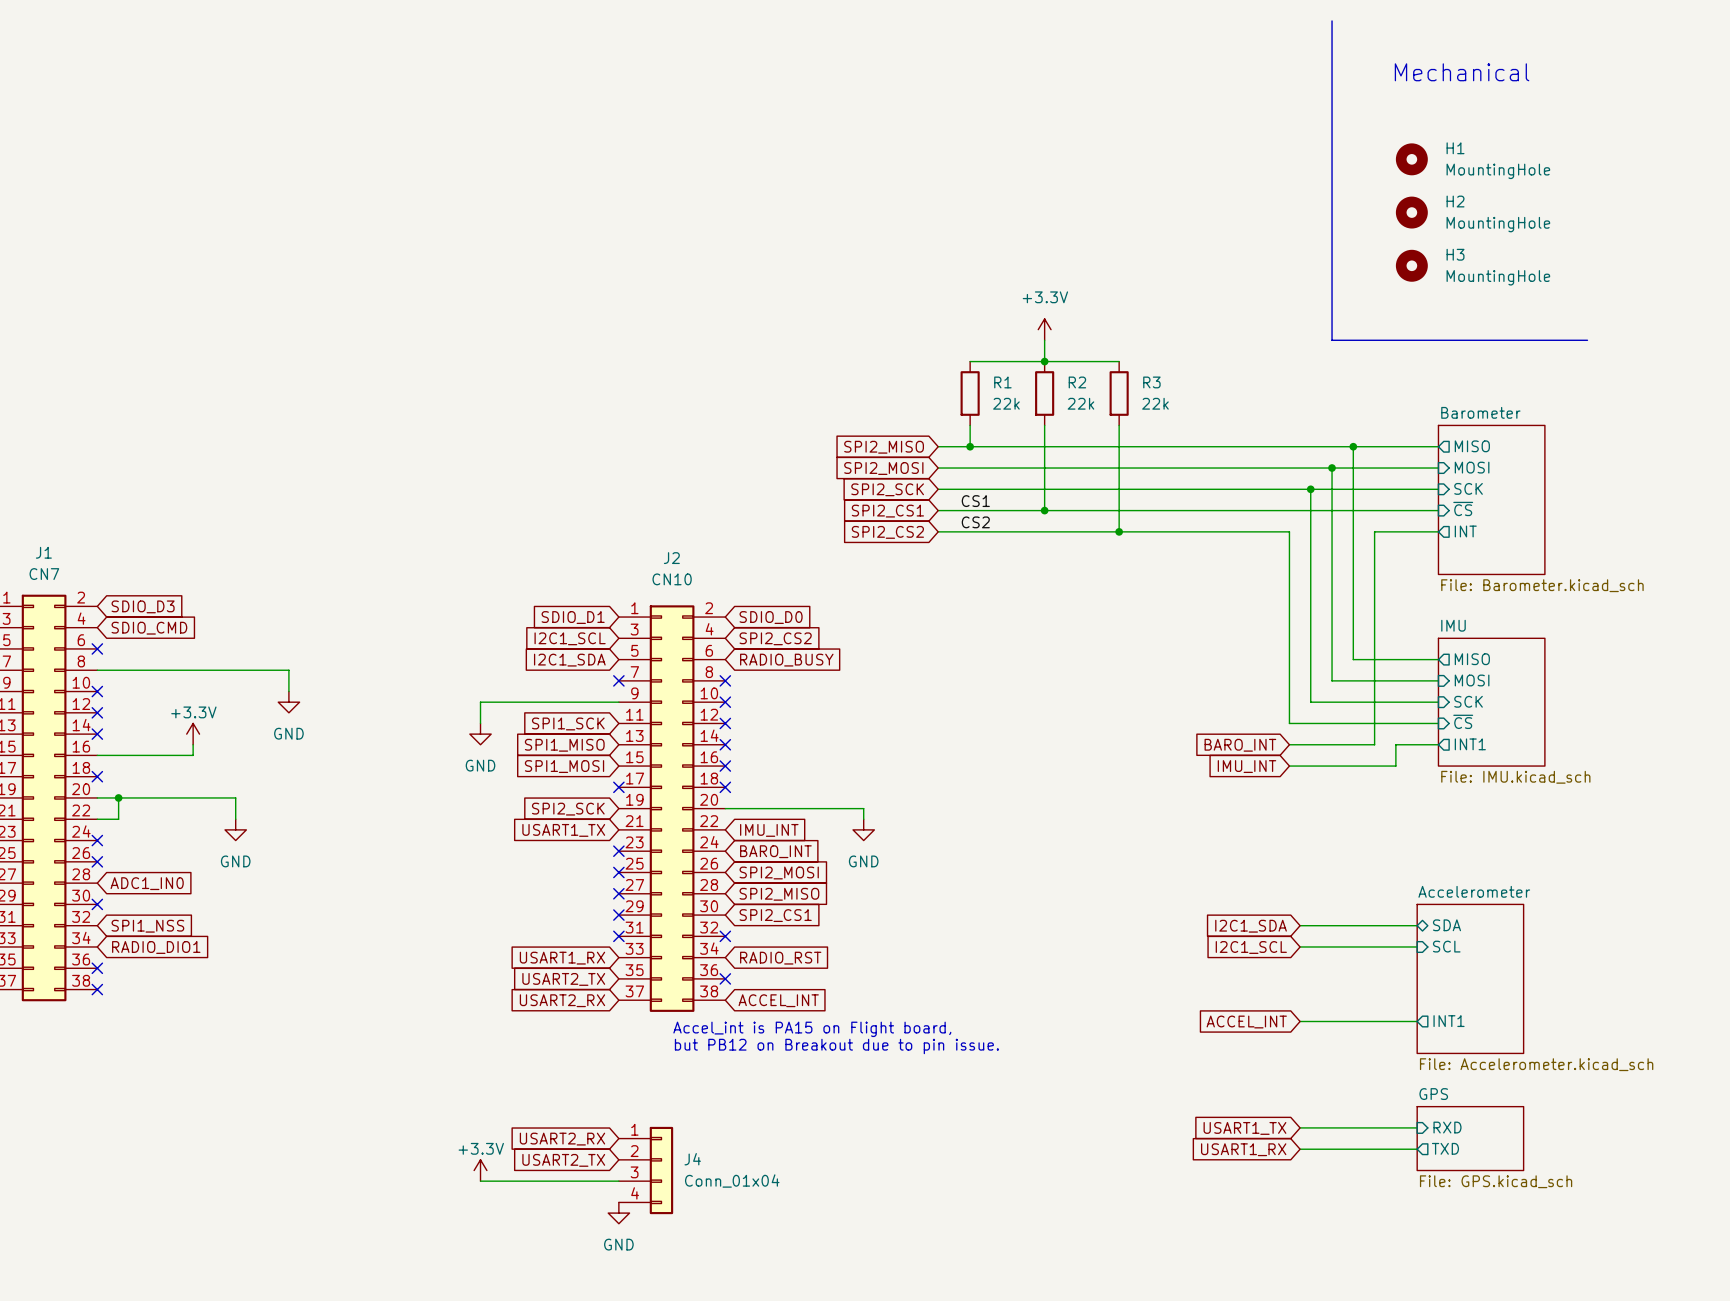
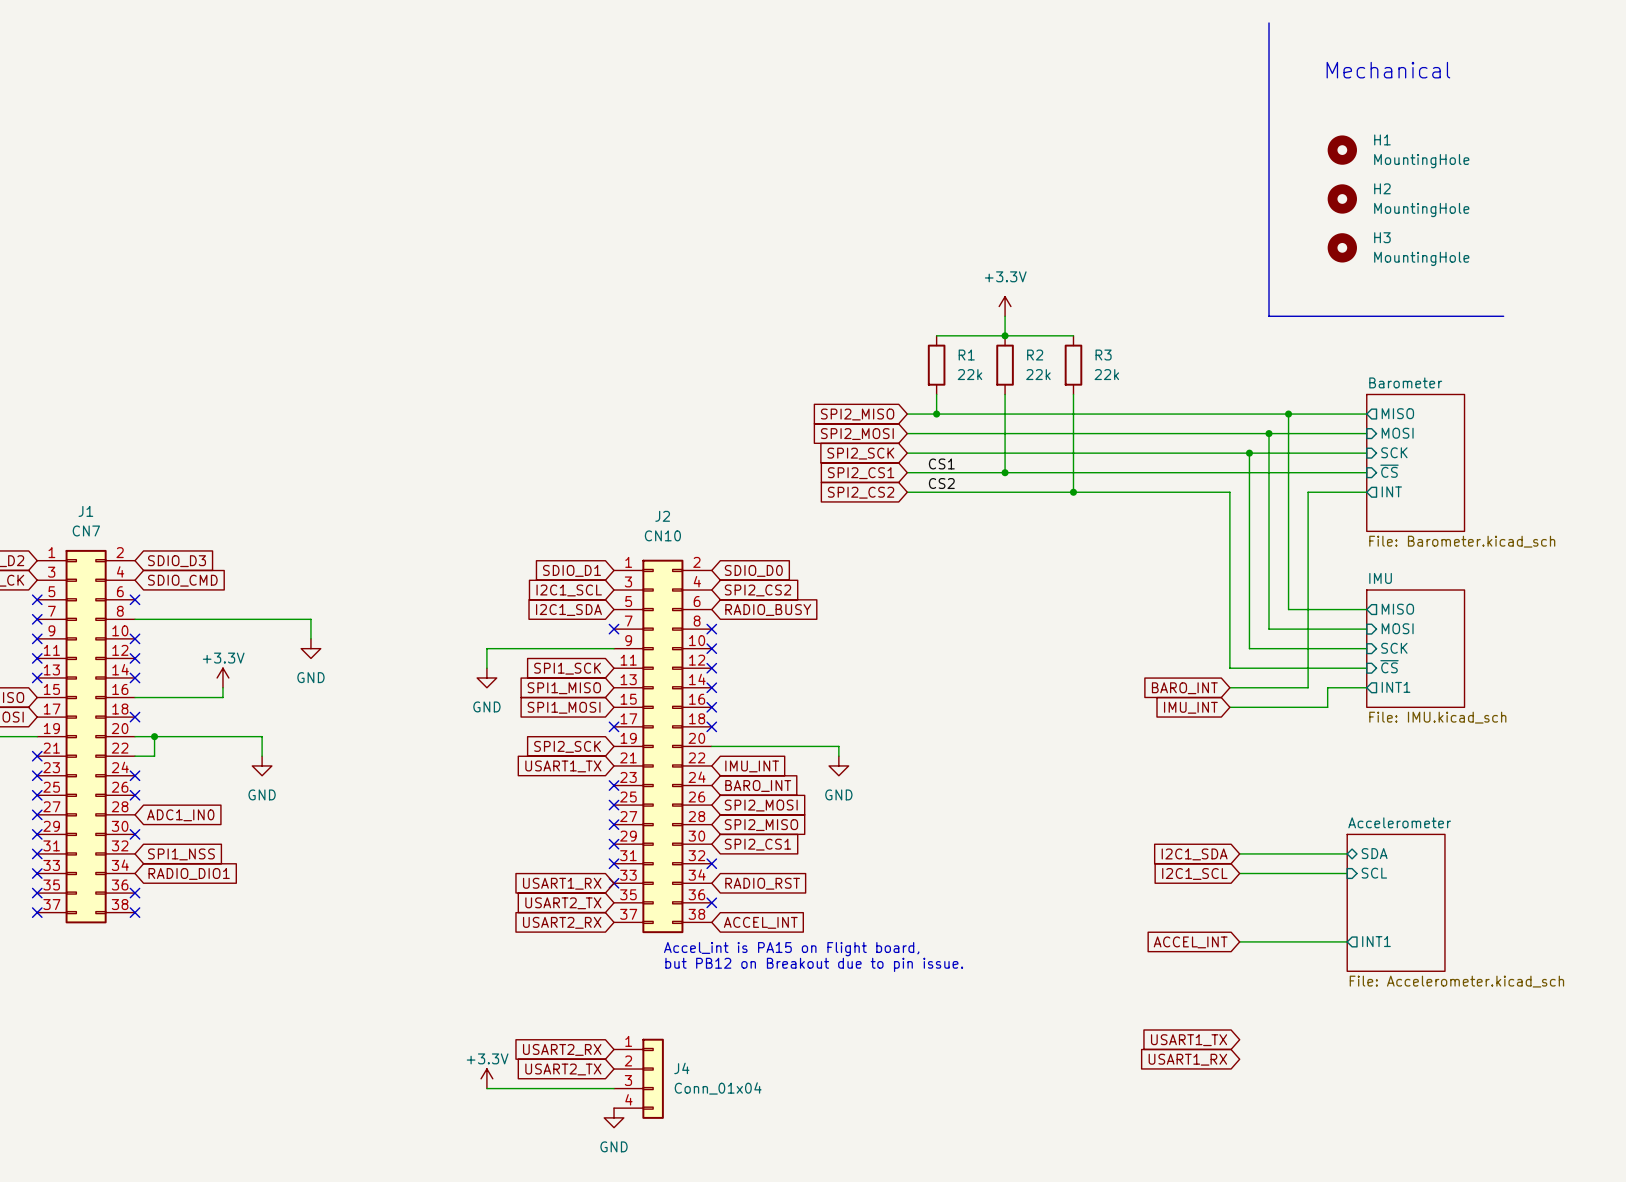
no-connect mark: none -> (614, 883)
wire: (1300, 1127) (1417, 1127) -> none
sheet pin: RXD (1447, 1127) -> none
sheet GPS: File: GPS.kicad_sch (1470, 1138) -> none
sheet pin: TXD (1445, 1148) -> none
wire: (1300, 1149) (1417, 1149) -> none

